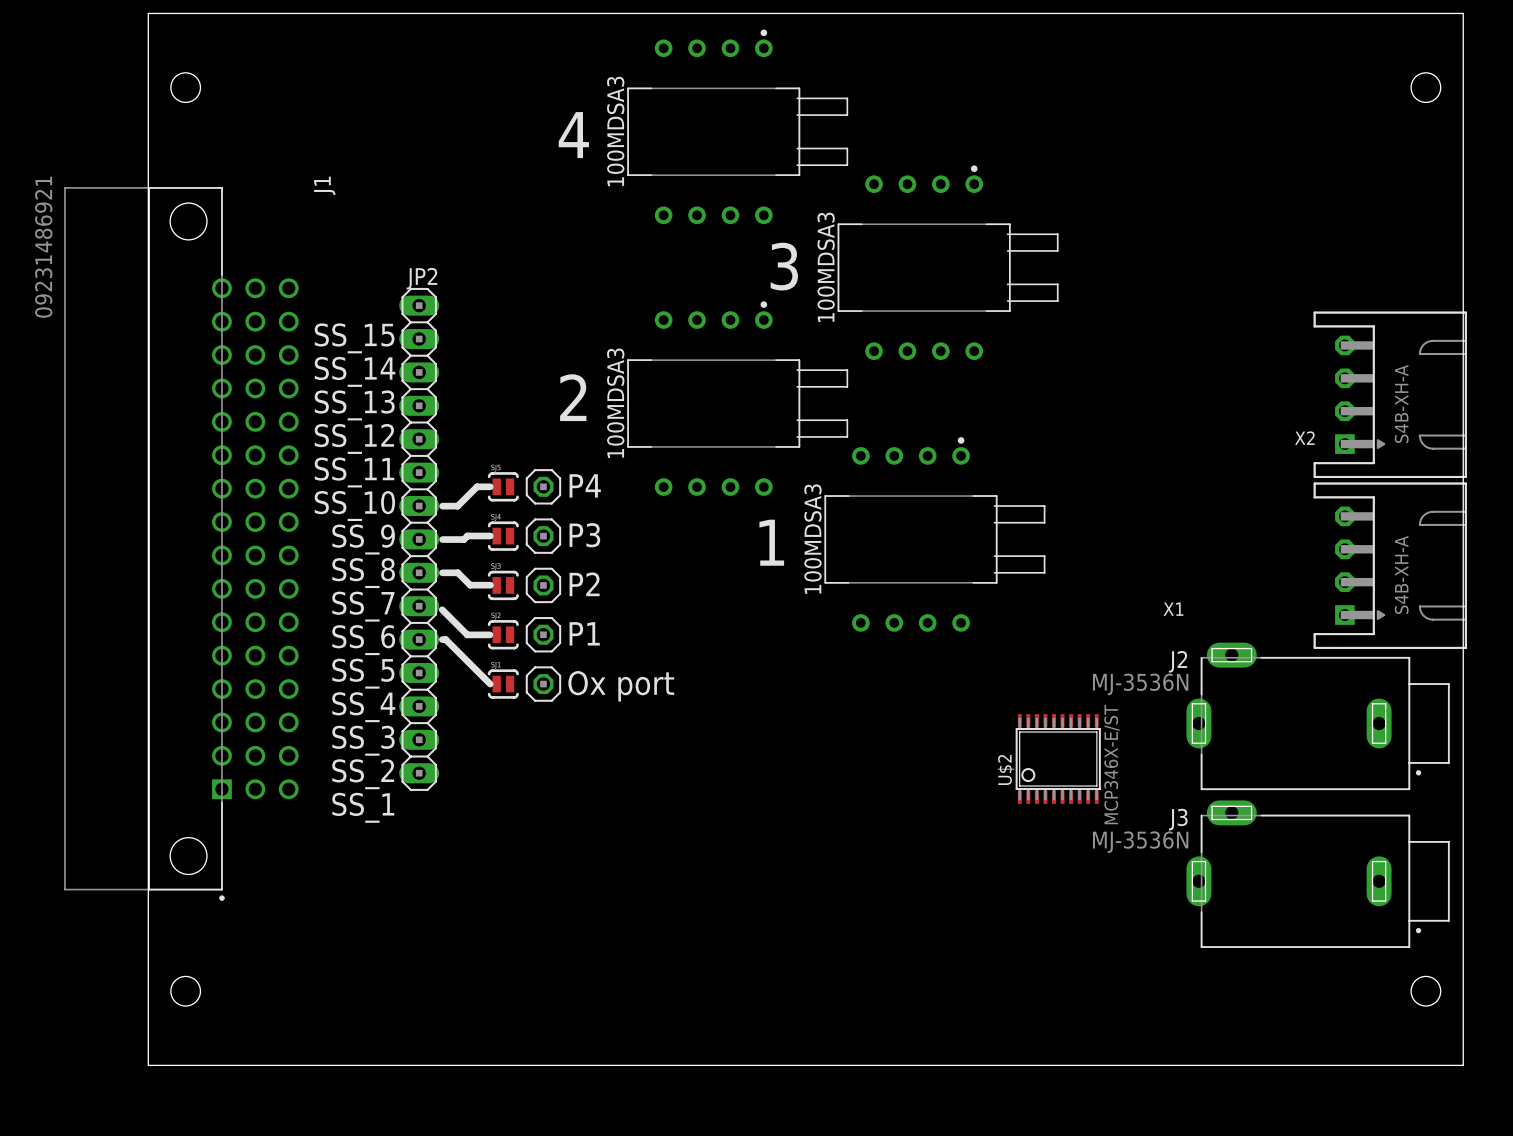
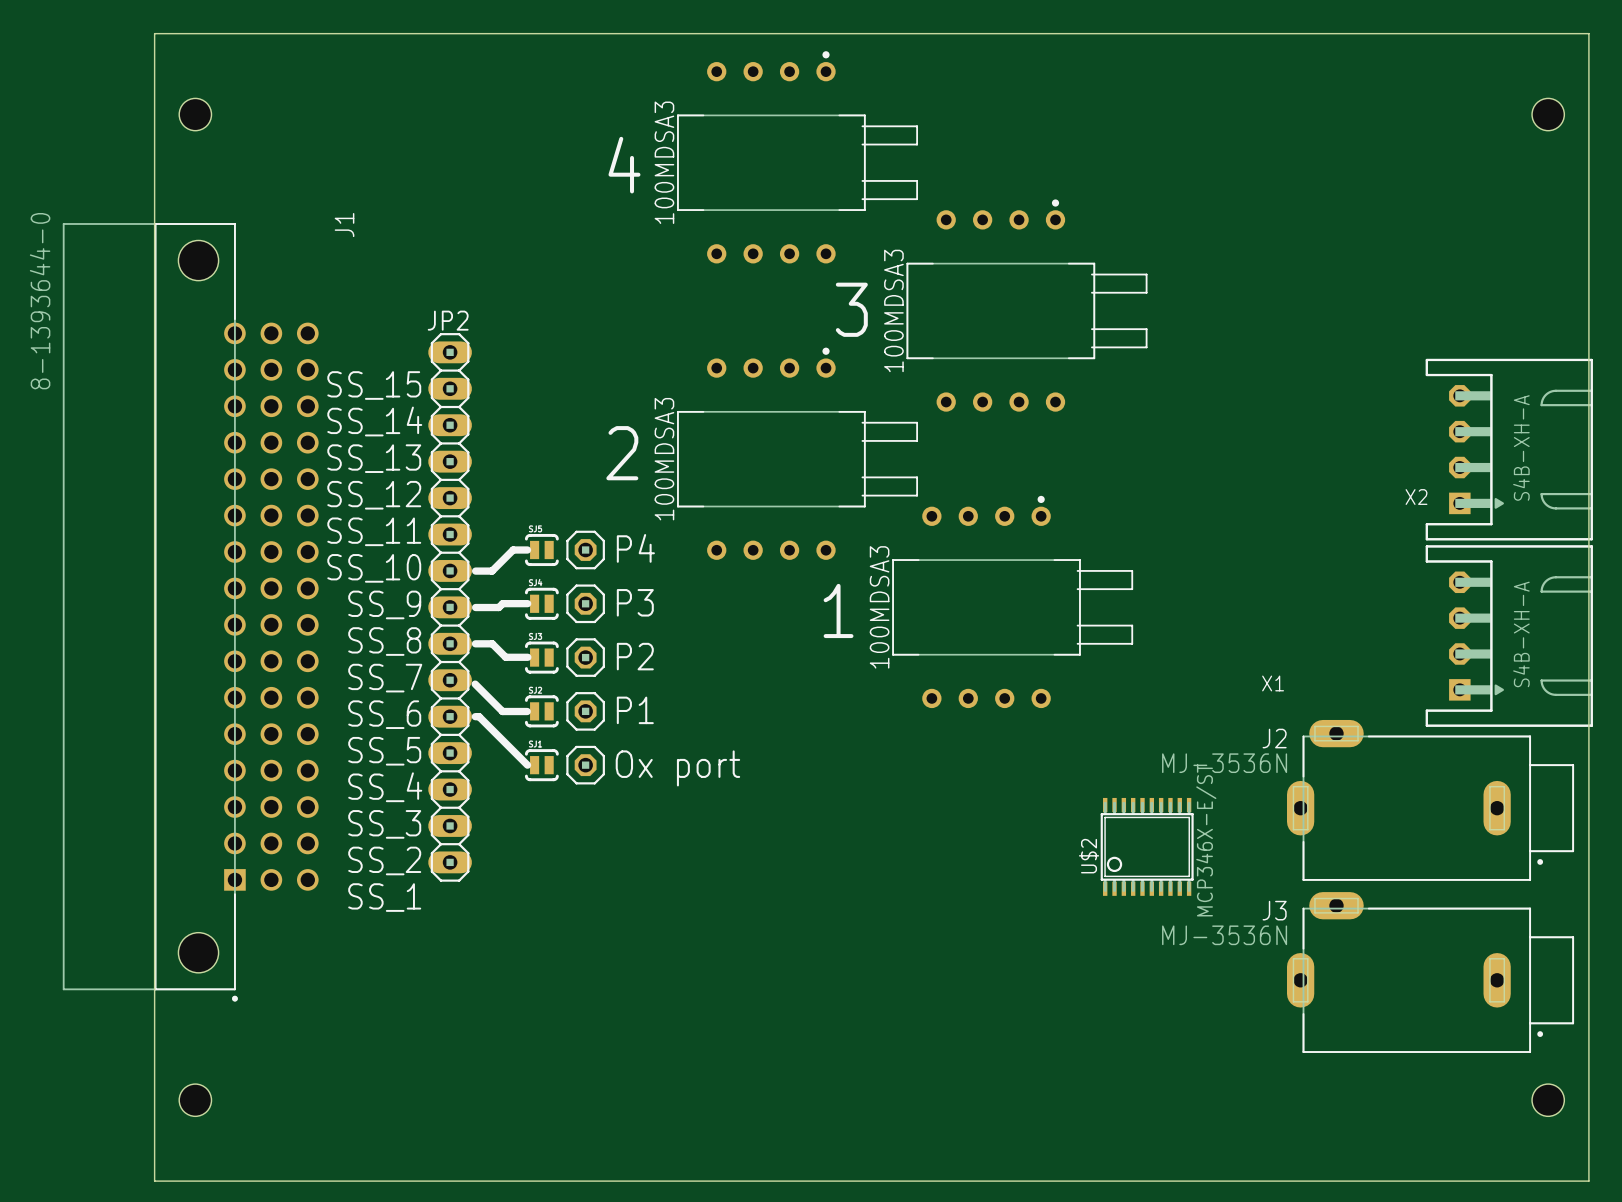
J1 value: 09231486921 (43, 247) -> 8-1393644-0 (40, 301)

